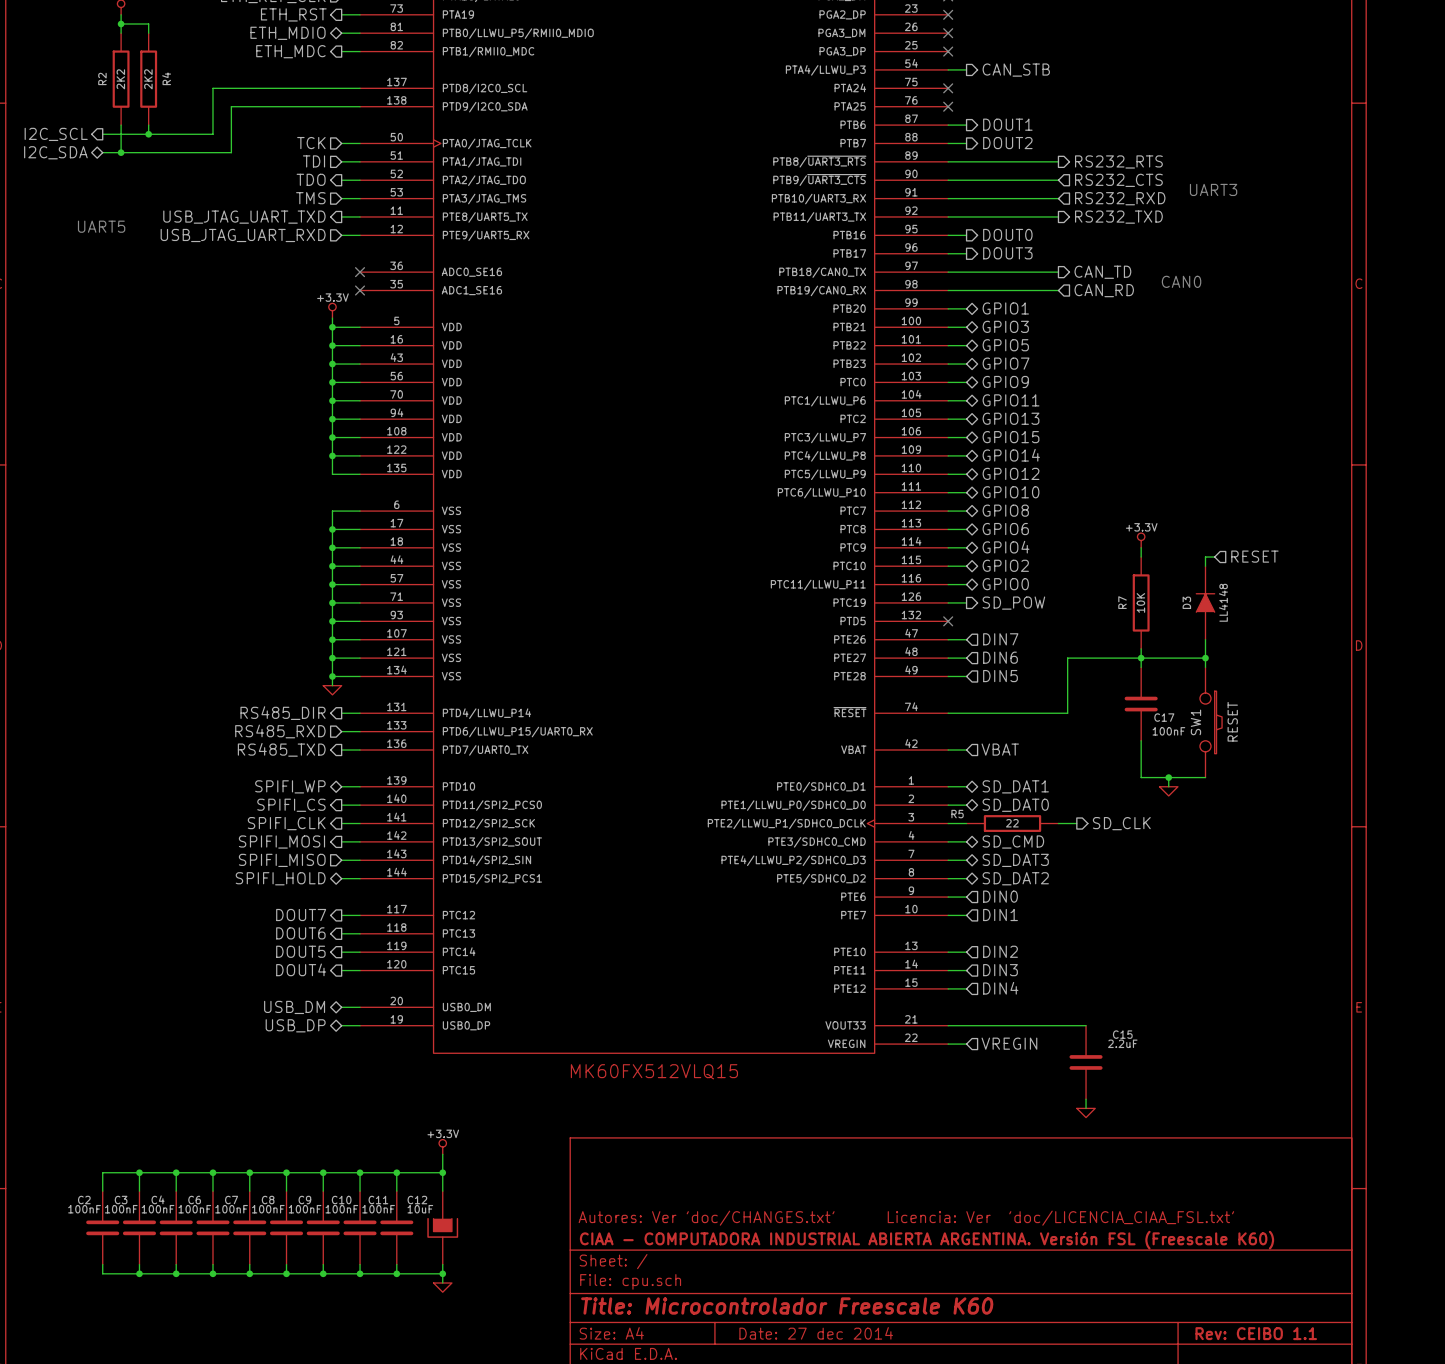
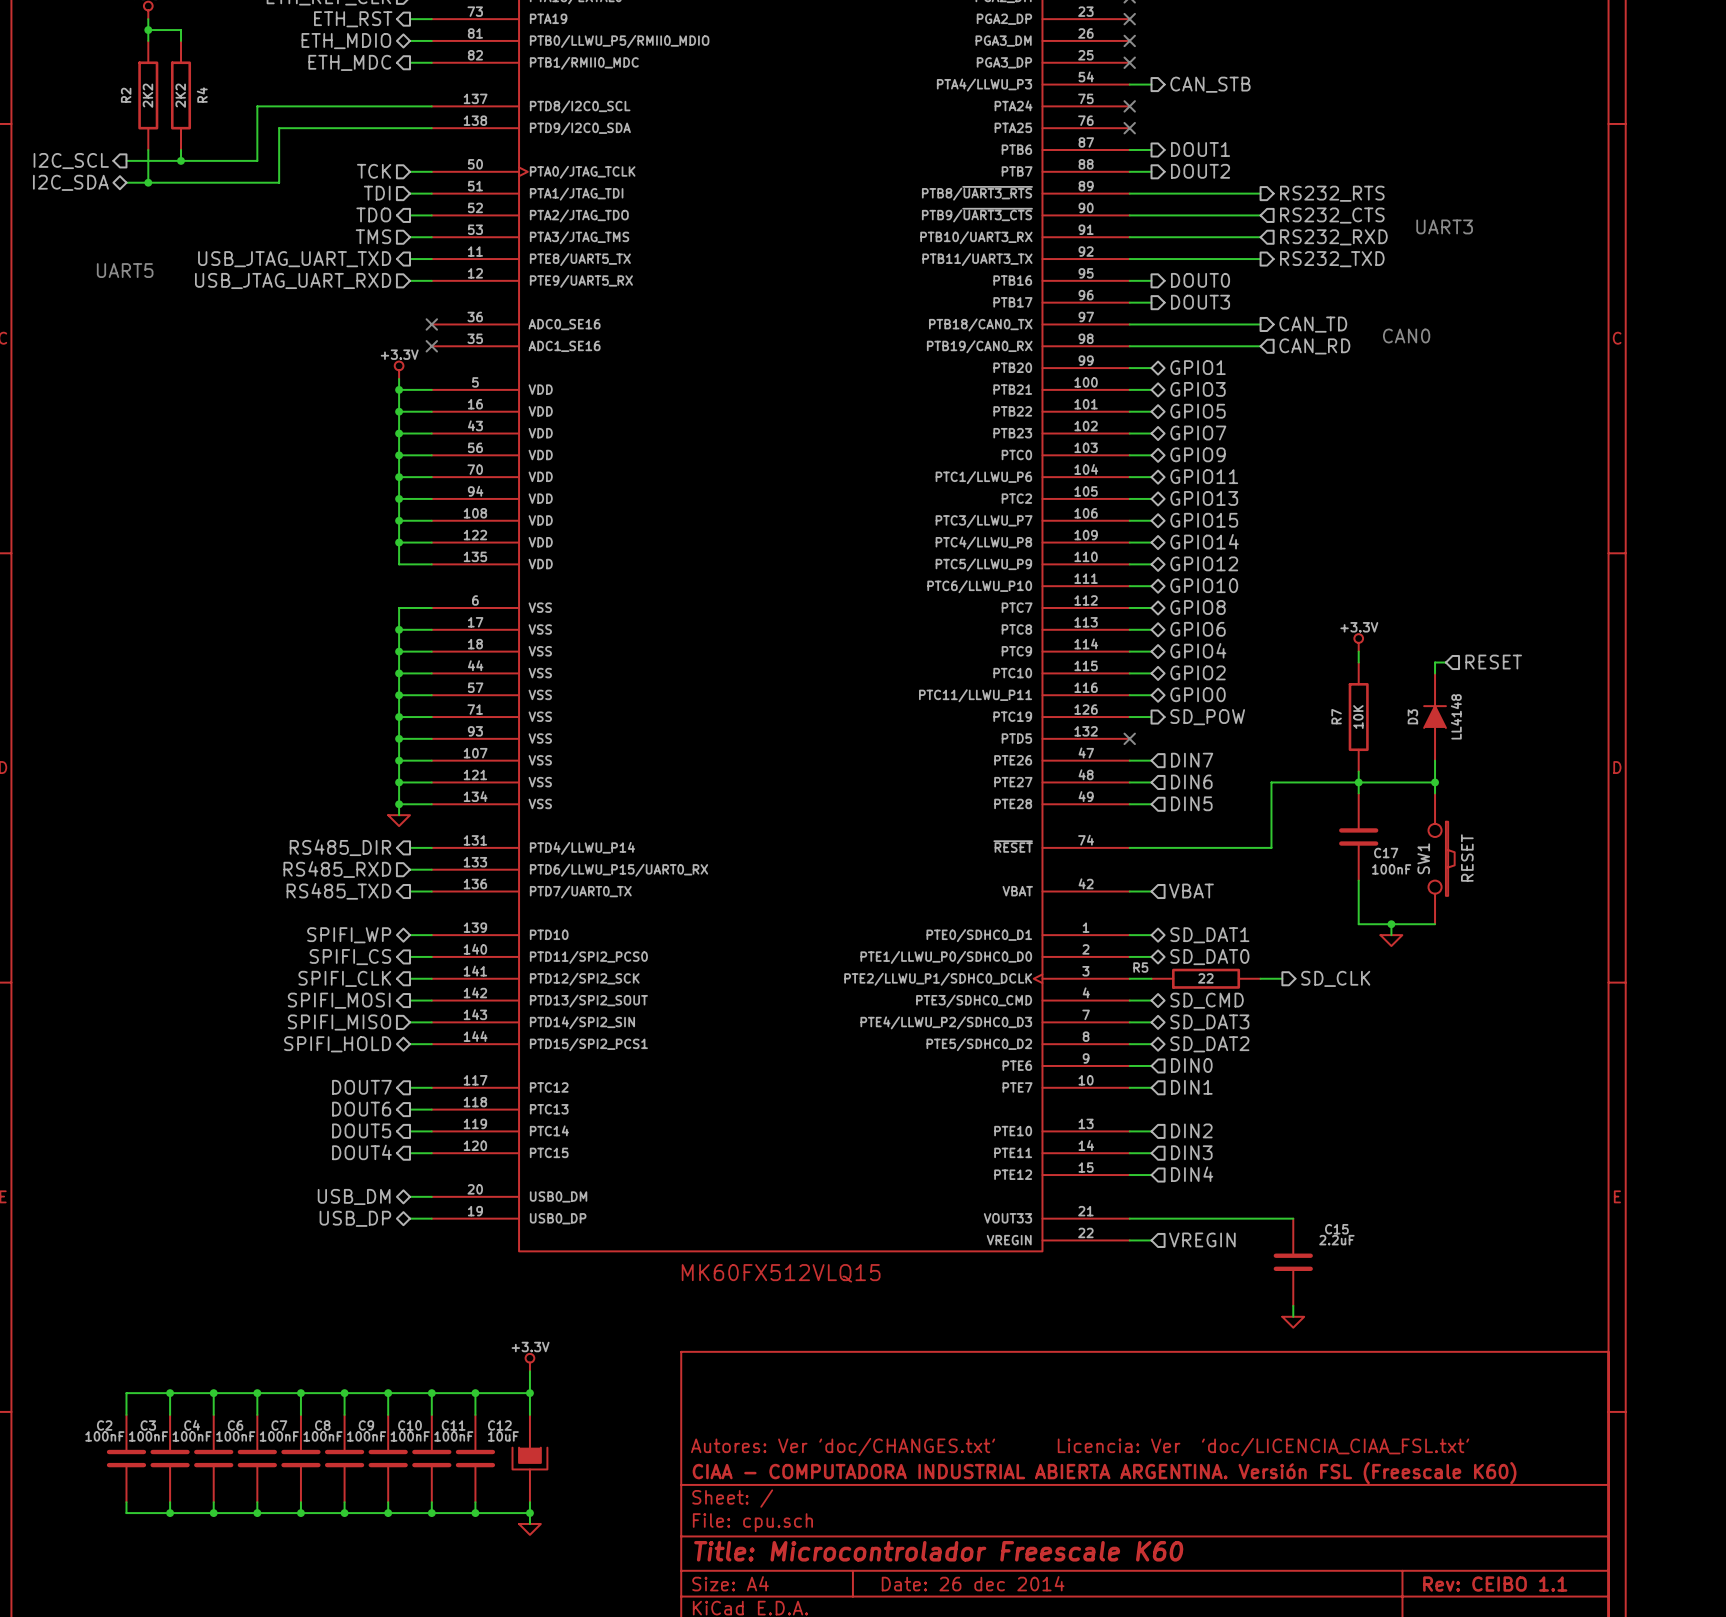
title block: Date: 27 dec 2014 (816, 1333) -> Date: 26 dec 2014 (973, 1583)

